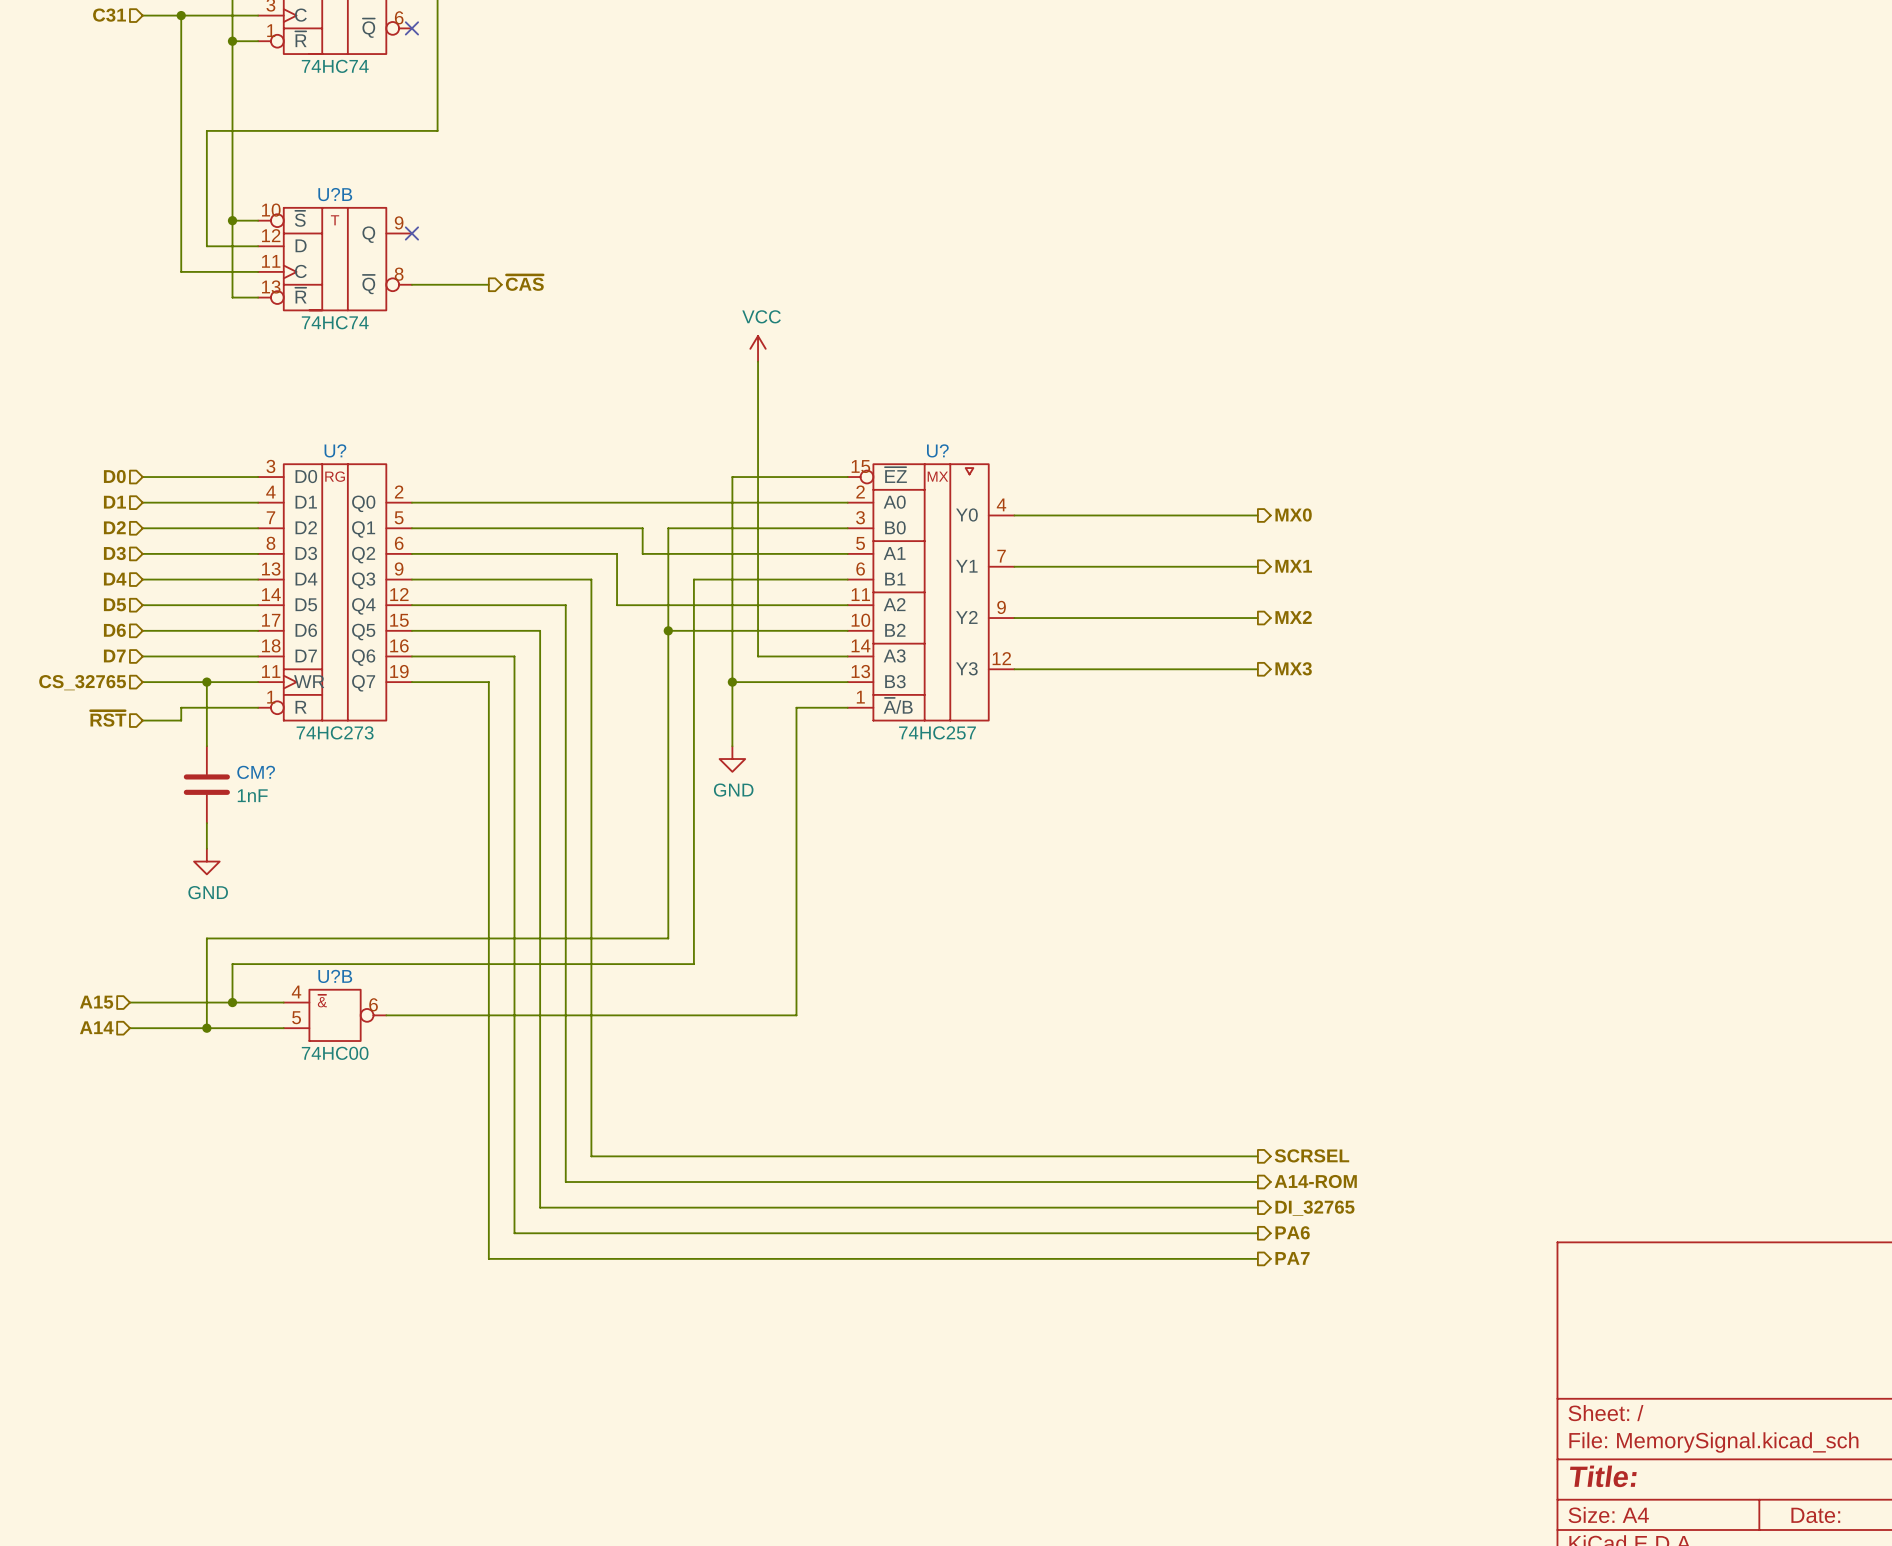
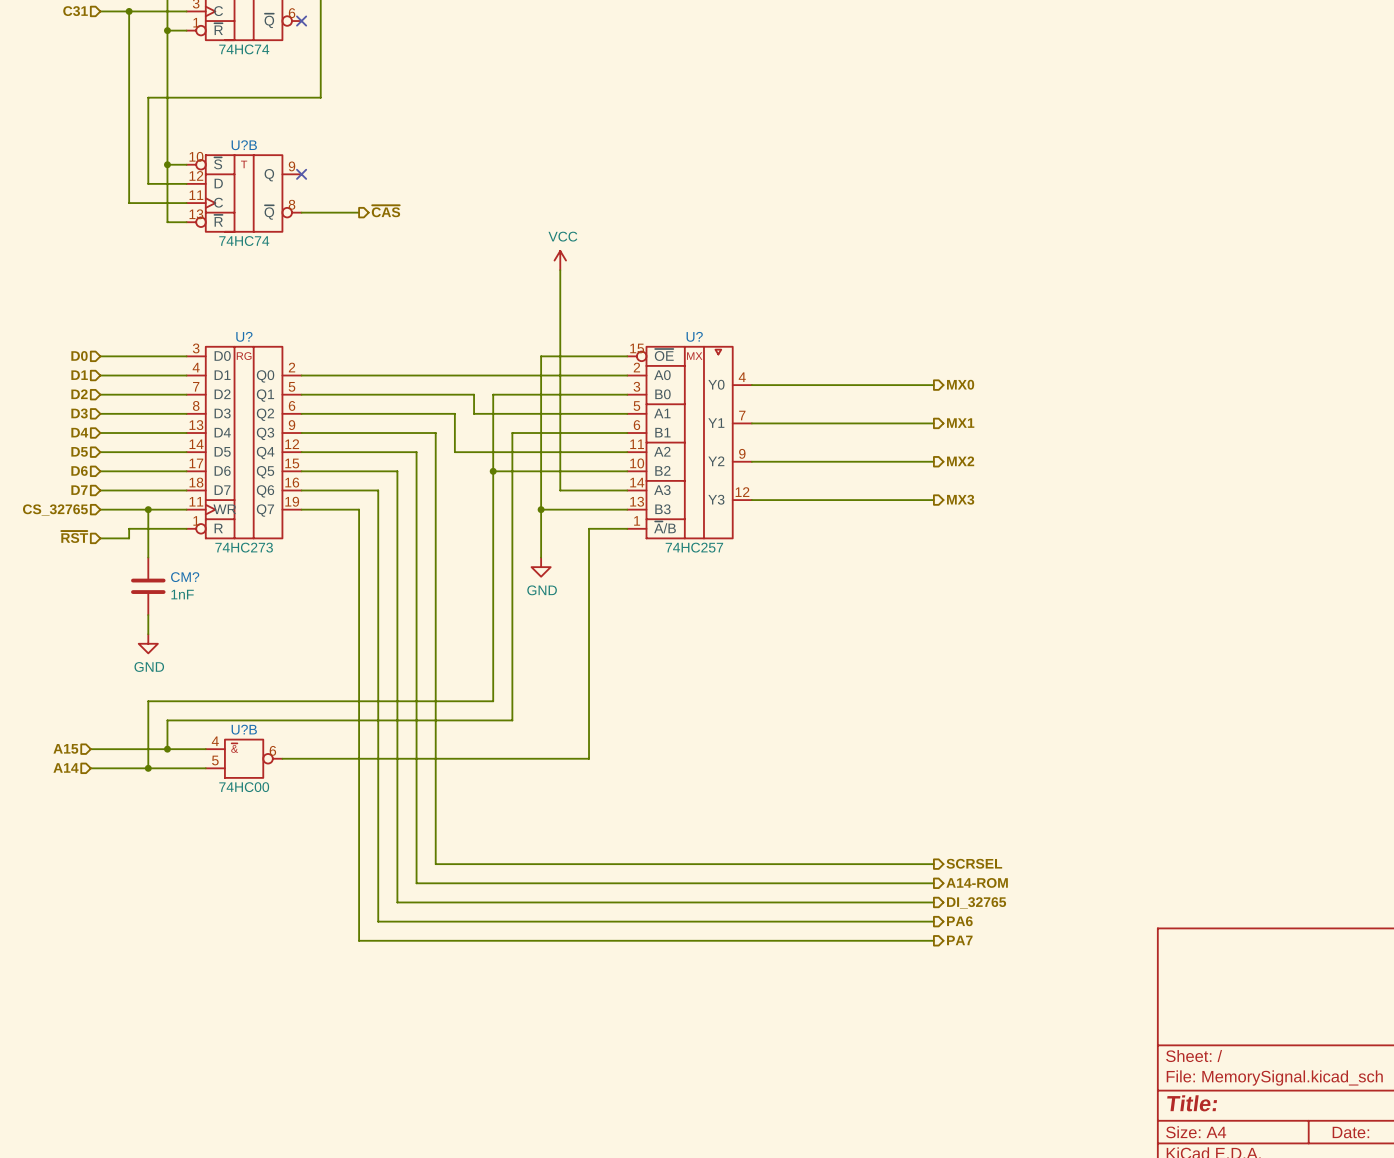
U? pin name: ~{EZ} (895, 475) -> ~{OE} (664, 354)

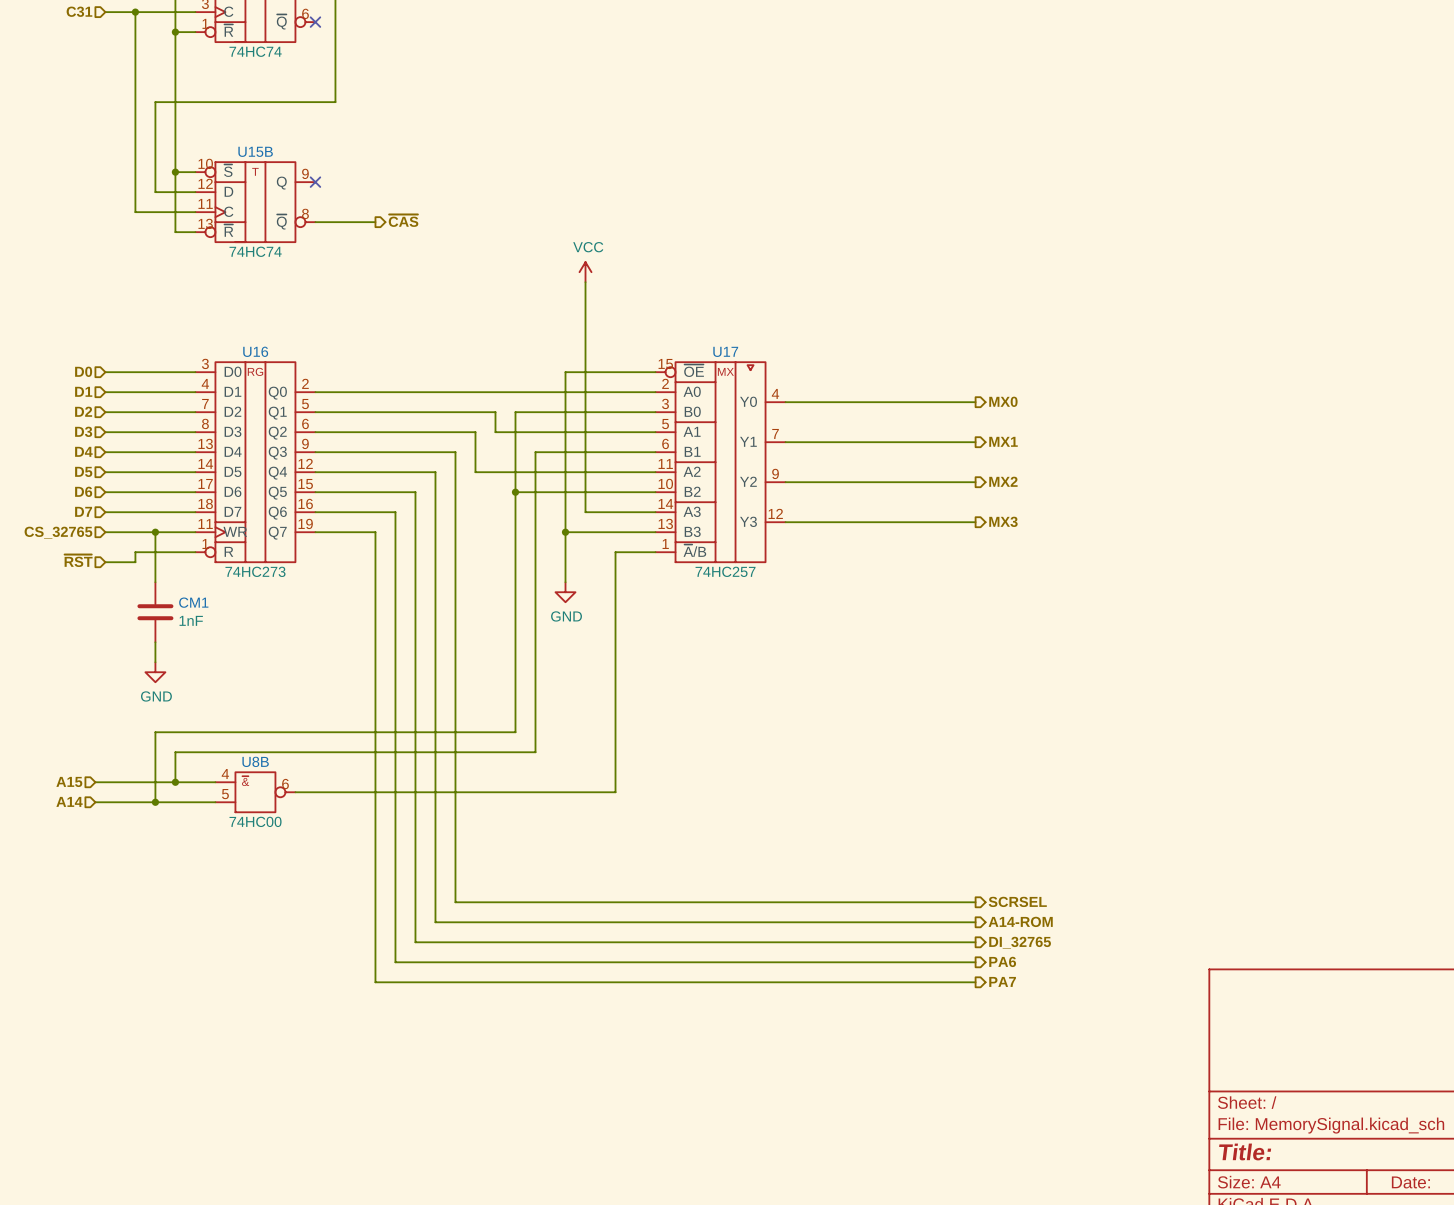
U?B name: U?B (244, 145) -> U15B (255, 151)
U? name: U? (244, 336) -> U16 (255, 351)
U? name: U? (694, 336) -> U17 (725, 351)
CM? name: CM? (185, 577) -> CM1 (193, 602)
U?B name: U?B (244, 729) -> U8B (255, 761)

